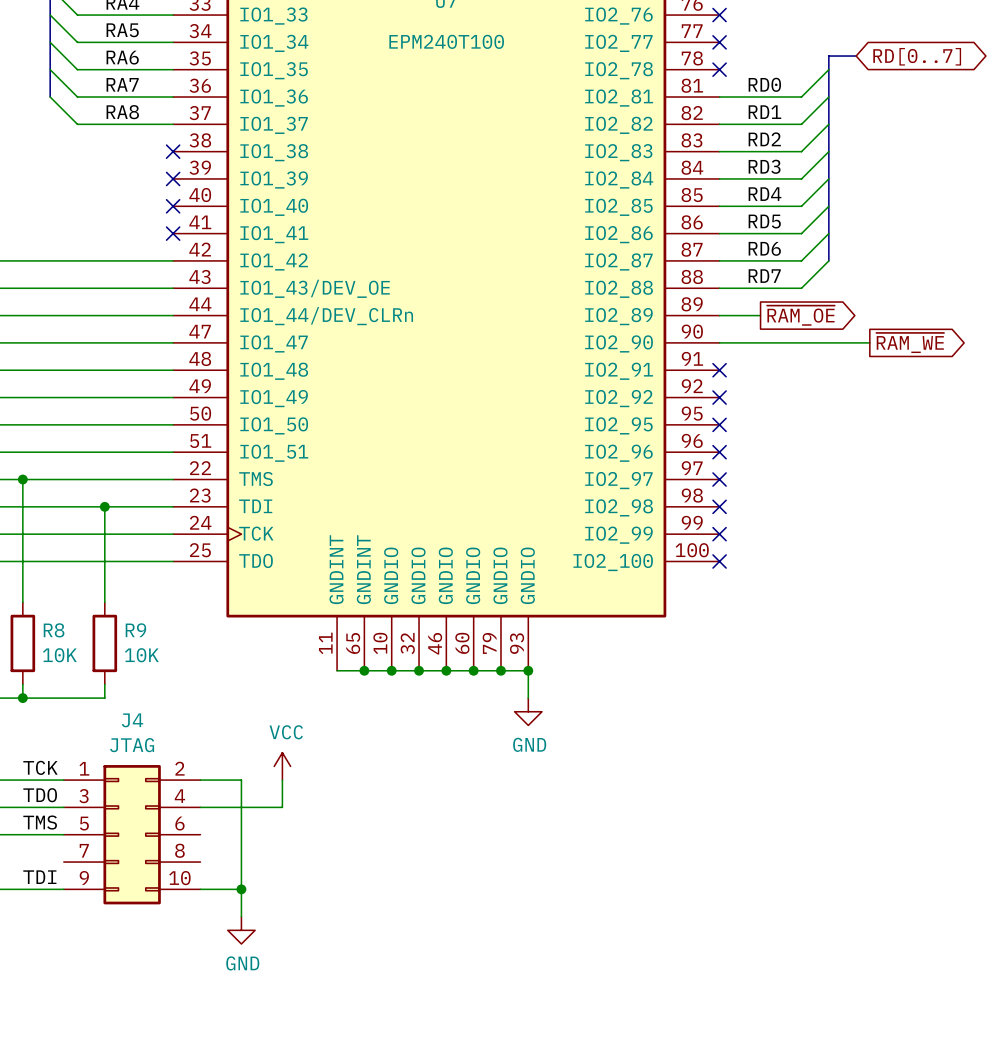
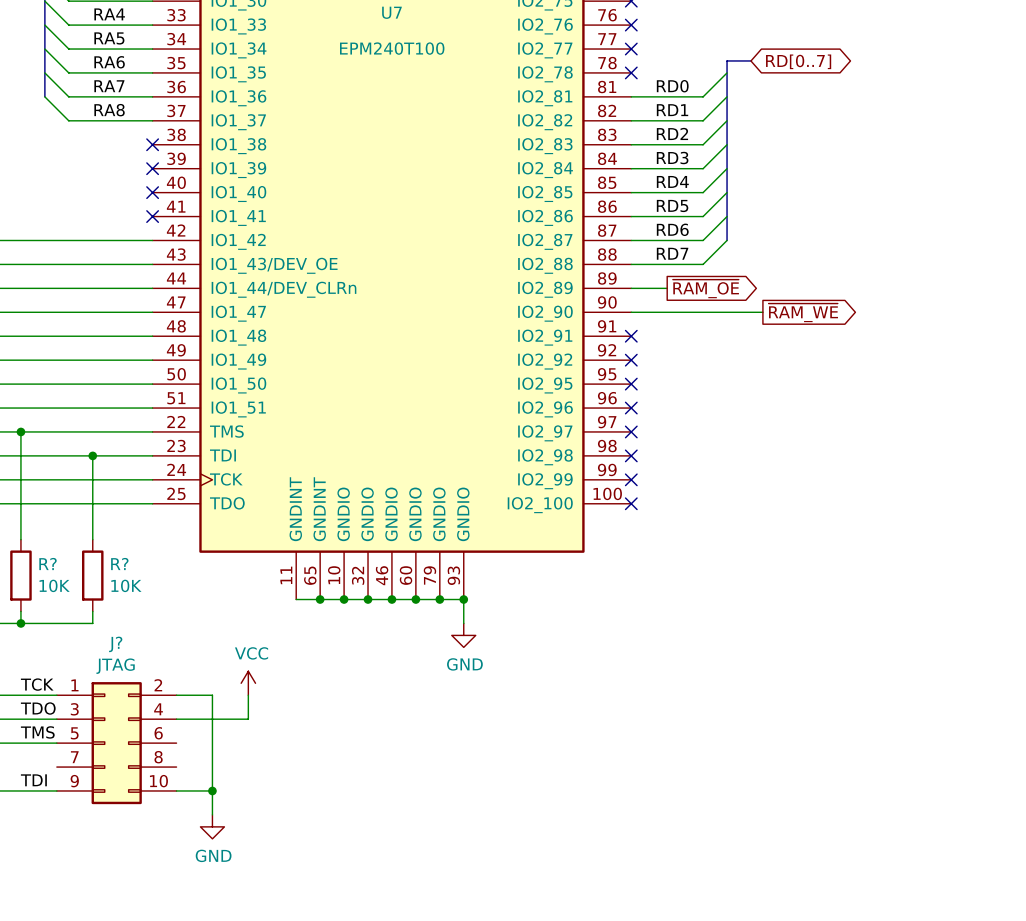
R8 name: R8 (54, 630) -> R? (48, 564)
R9 name: R9 (135, 630) -> R? (119, 564)
J4 name: J4 (132, 720) -> J? (115, 644)

